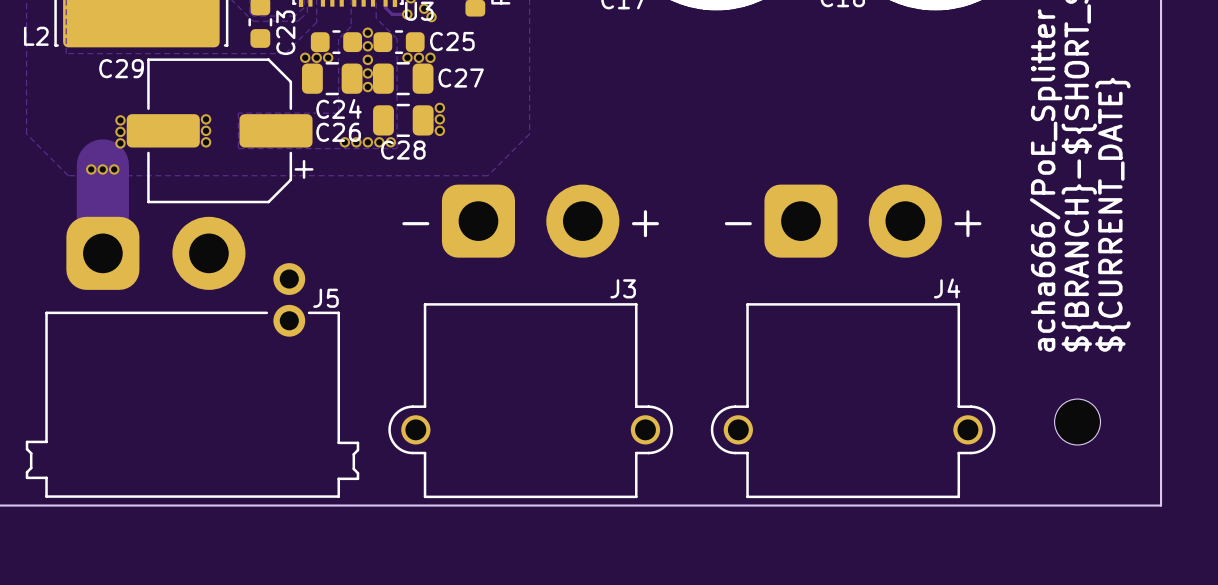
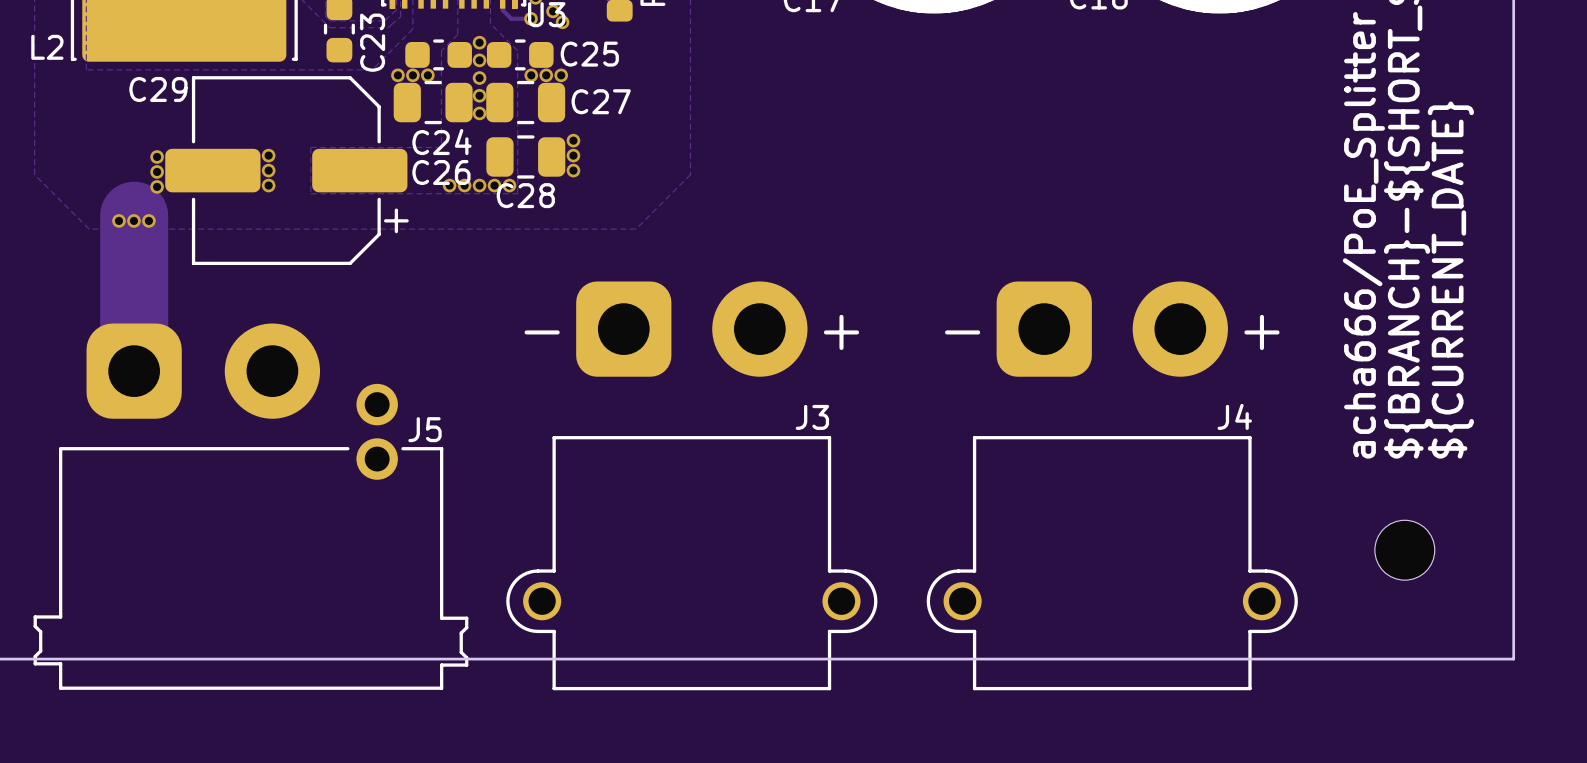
J3 position: (530, 341) -> (691, 485)
J4 position: (853, 341) -> (1112, 485)
J5 position: (192, 357) -> (250, 506)

